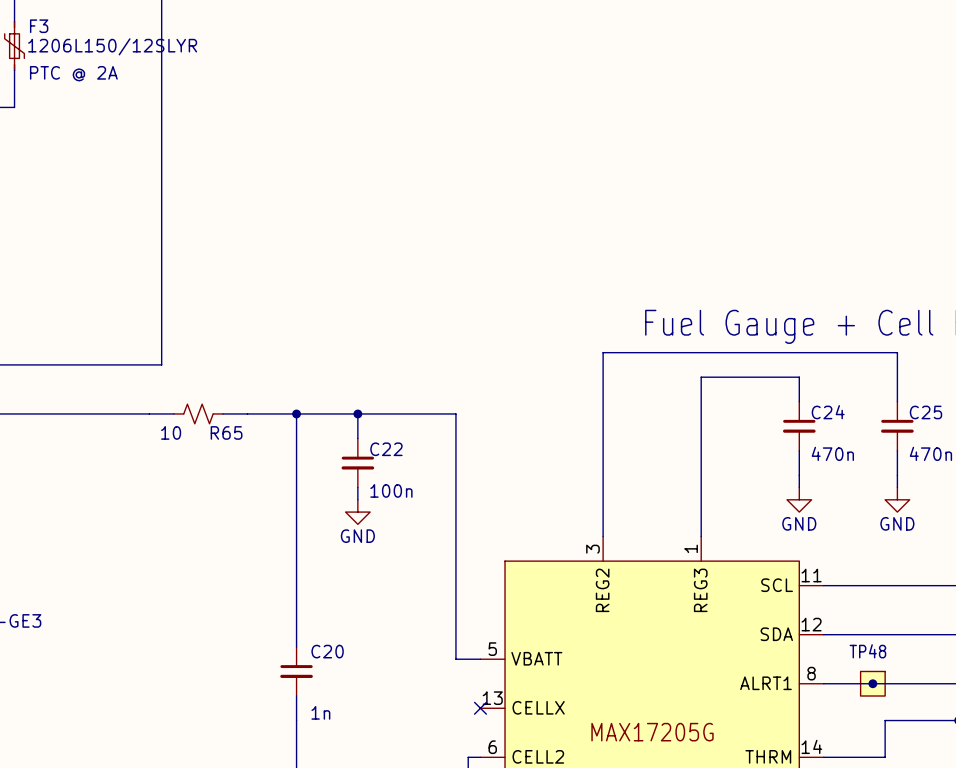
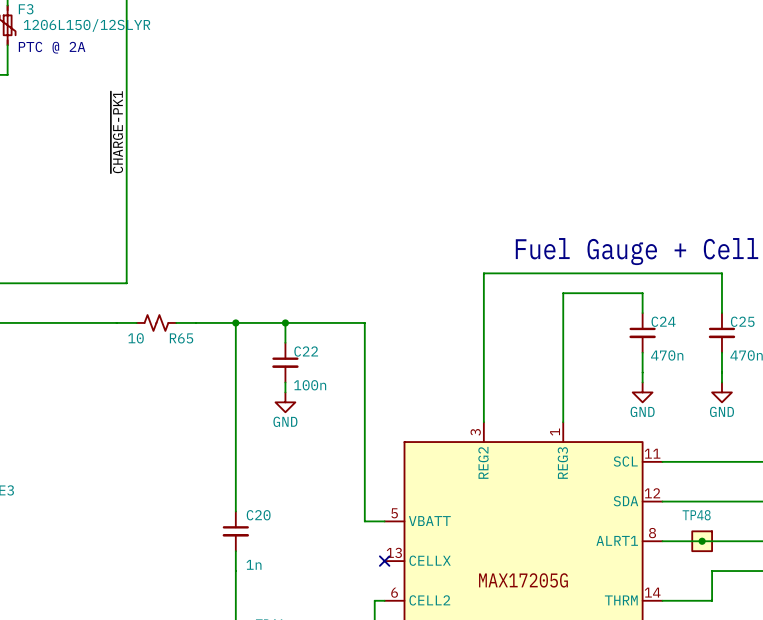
label: none -> ~{CHARGE-PK1} (116, 132)

